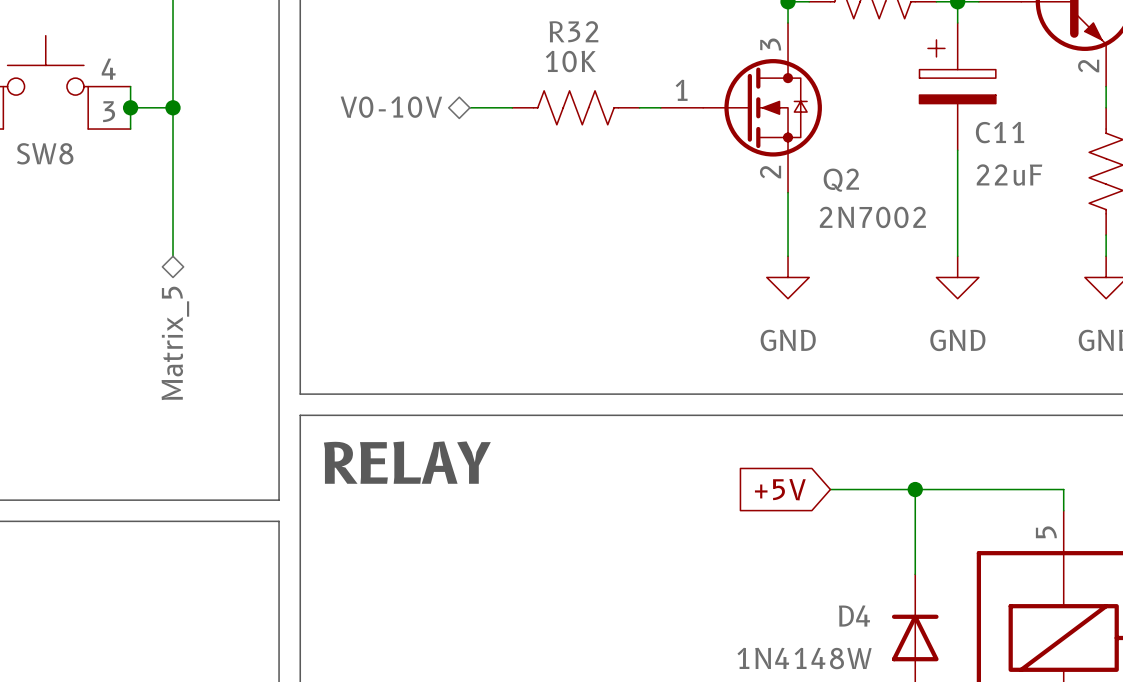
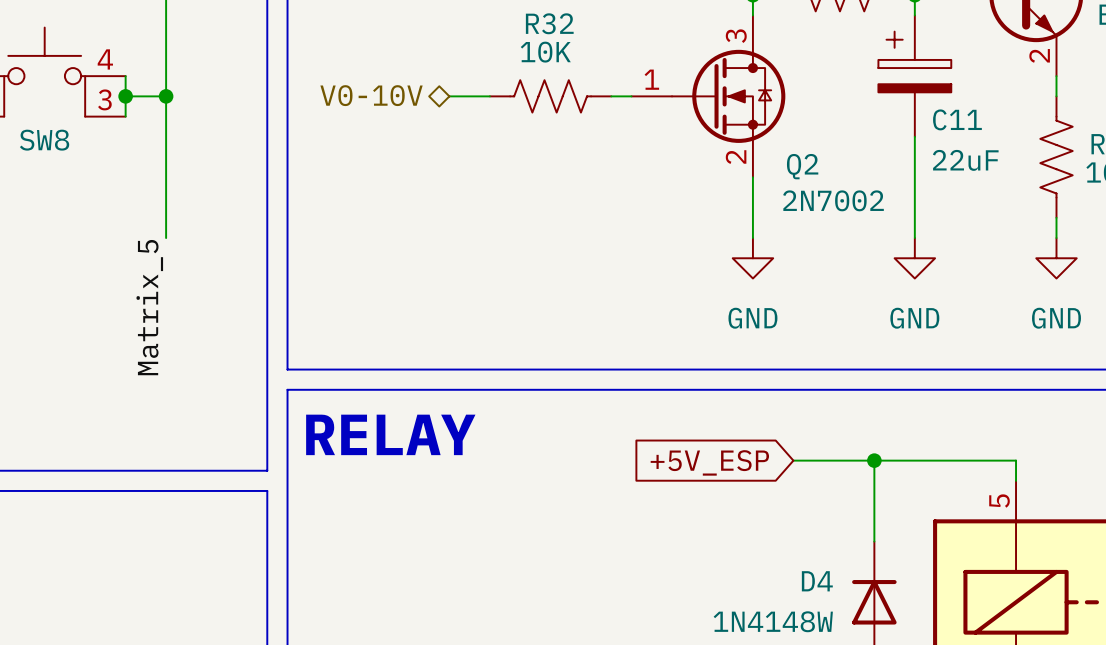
label: none -> Matrix_5 (149, 307)
hierarchical label: Matrix_5 (175, 343) -> none
global label: +5V (780, 489) -> +5V_ESP (709, 462)

